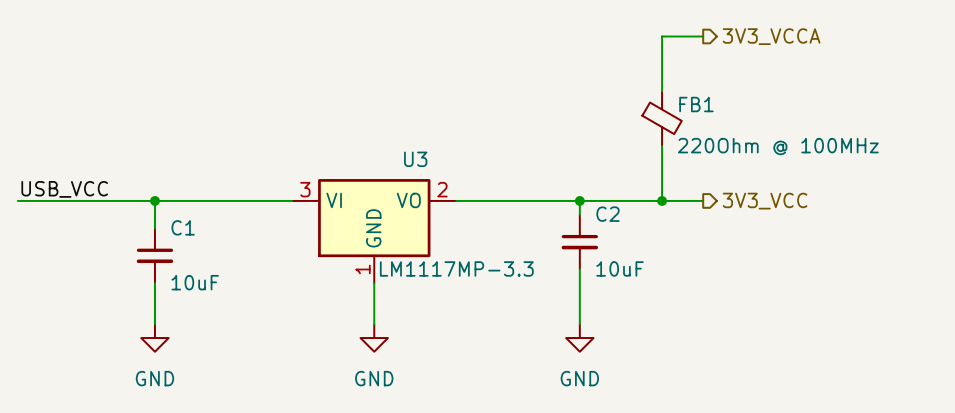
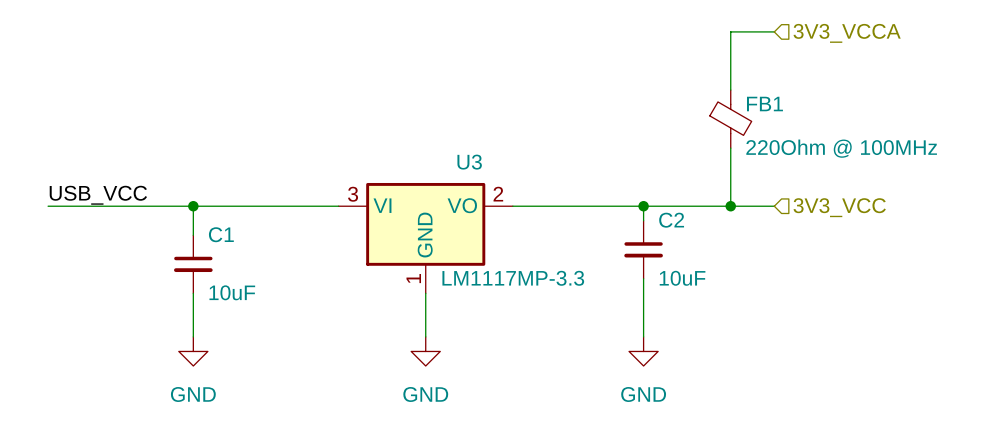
hierarchical label shape: output (771, 36) -> input (847, 33)
hierarchical label shape: output (765, 201) -> input (839, 207)

